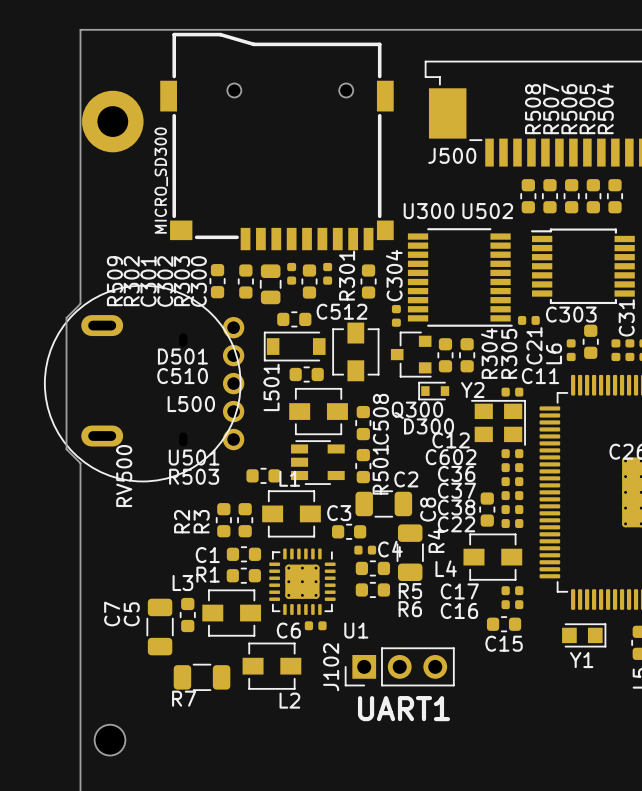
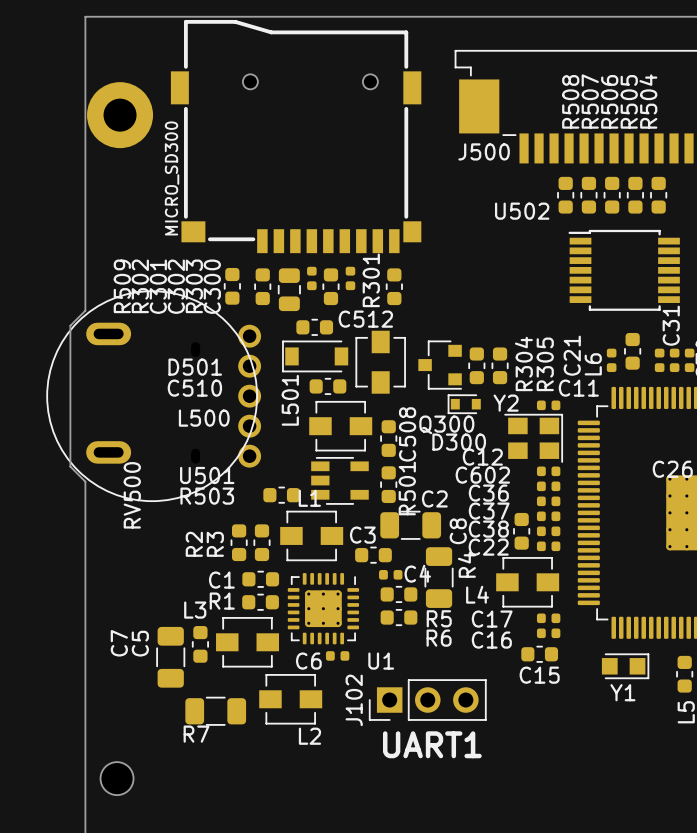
U300: (460, 277) -> none
C304: (396, 315) -> none
C303: (528, 320) -> none

